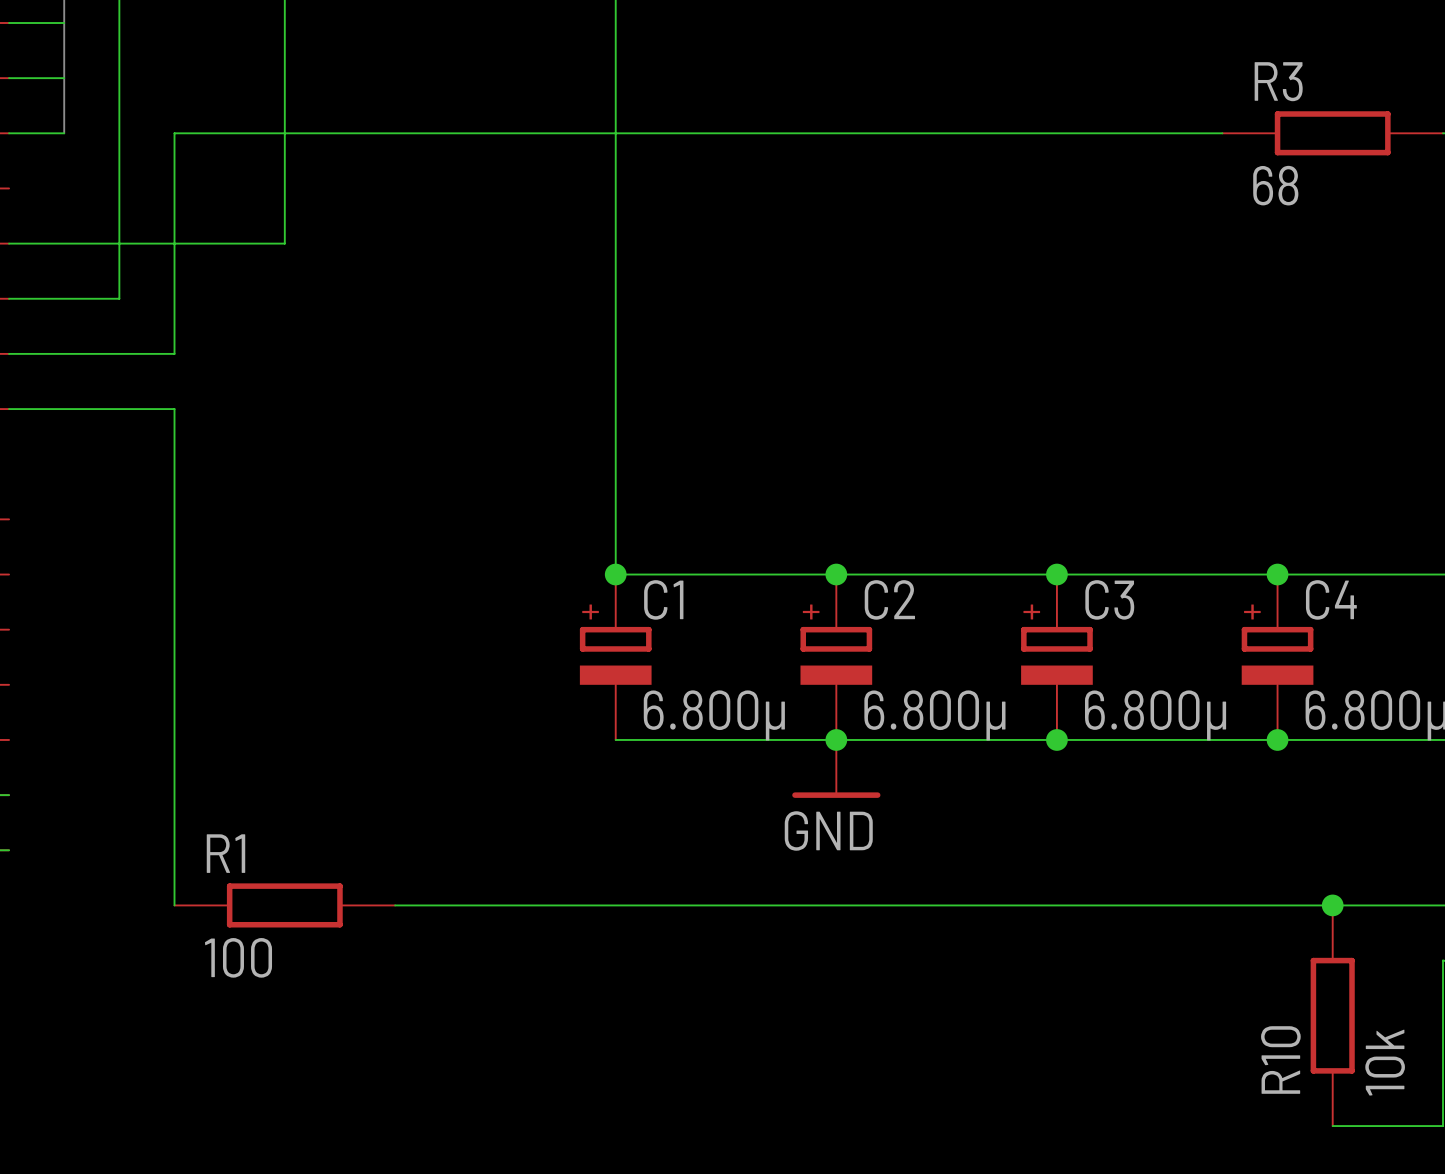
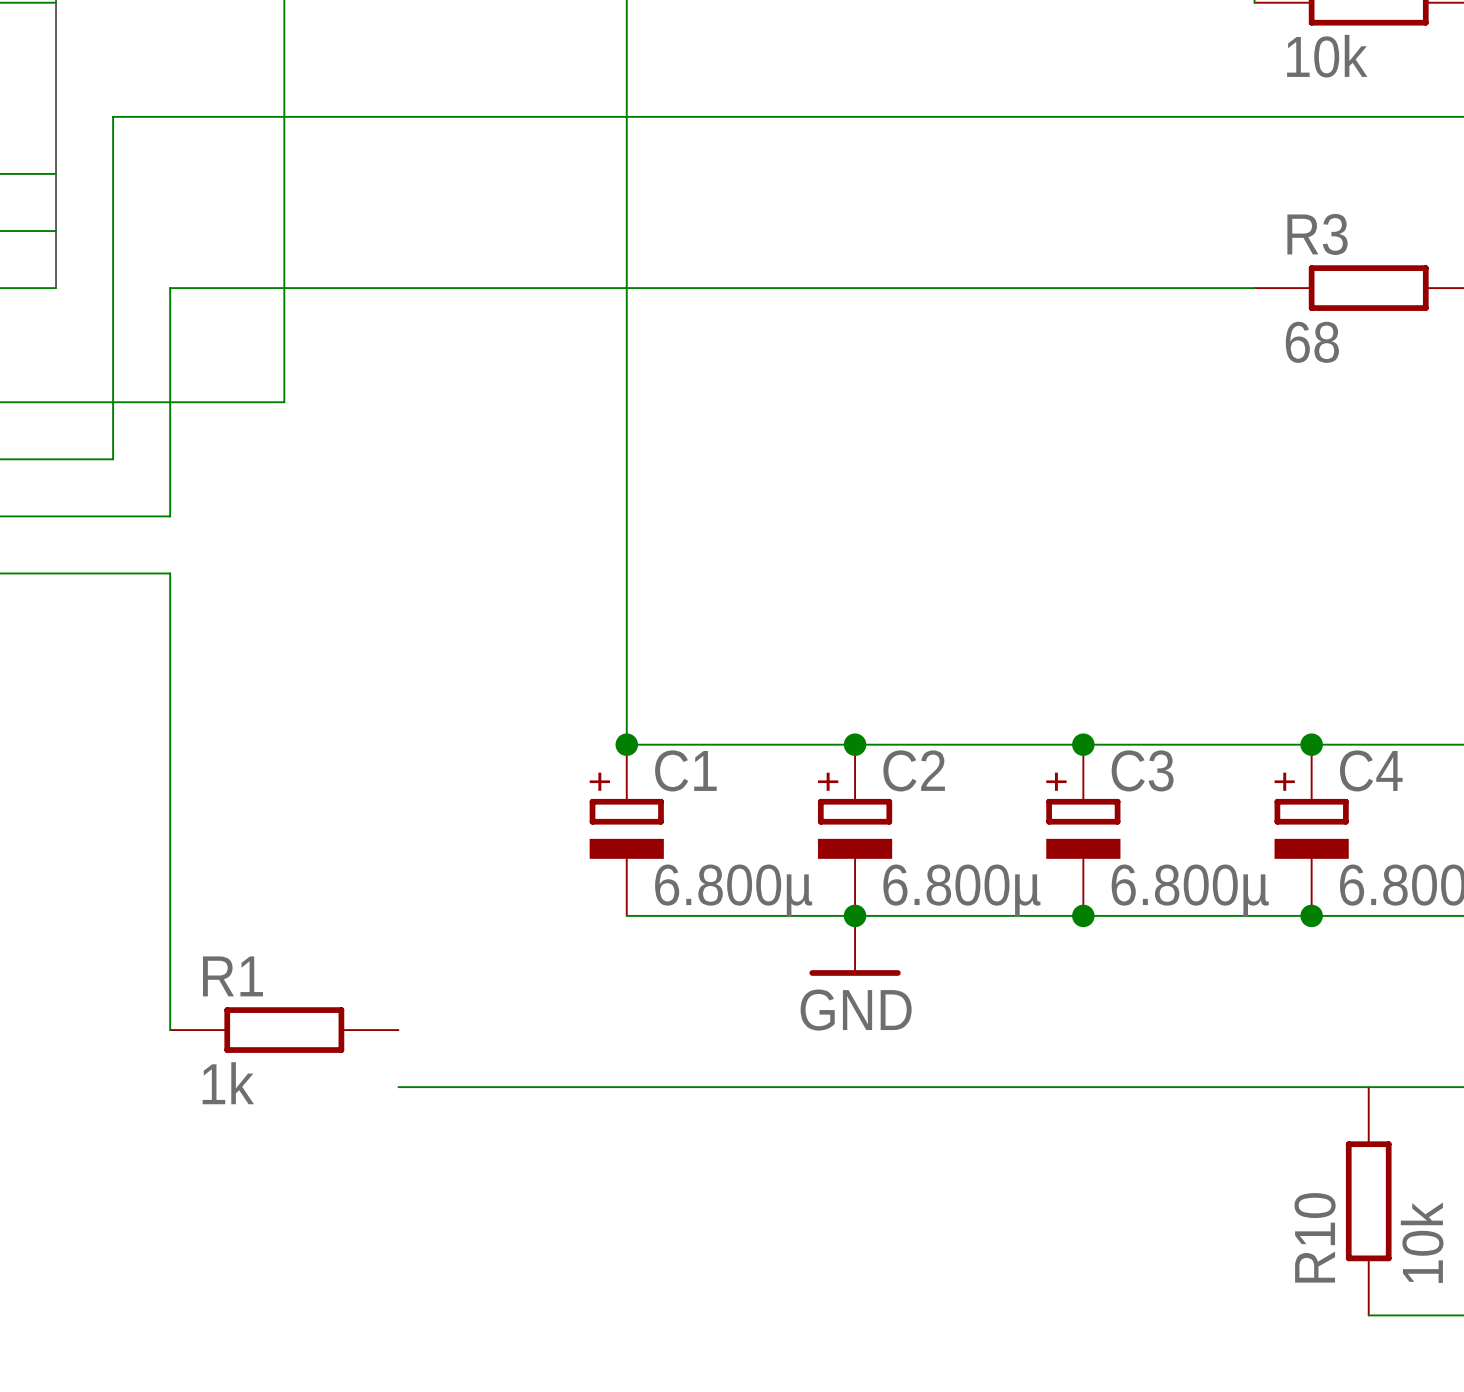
wire: (174, 850) (174, 905) -> none
R1 position: (284, 905) -> (284, 1030)
junction: (1332, 905) -> none
R1 value: 100 (238, 957) -> 1k (228, 1083)

